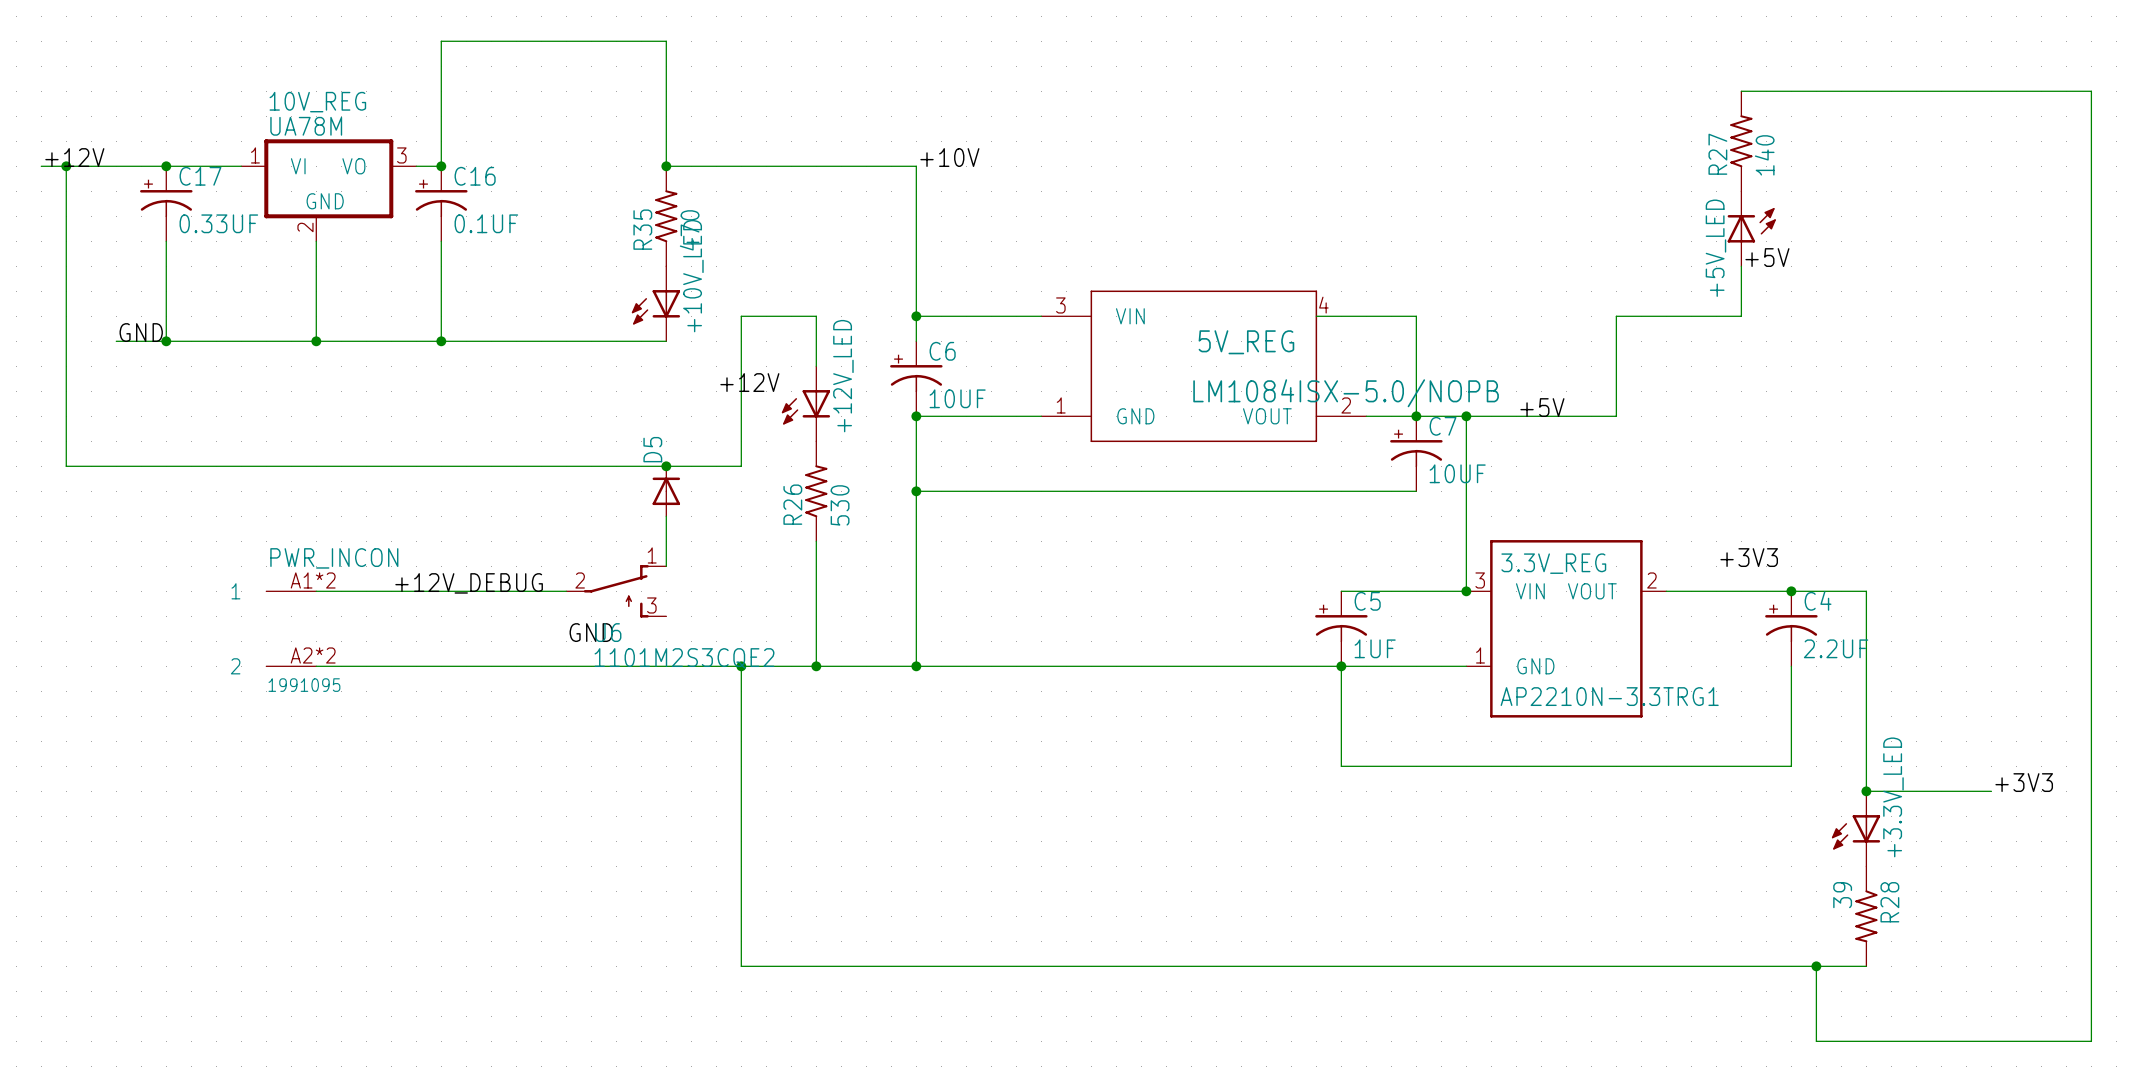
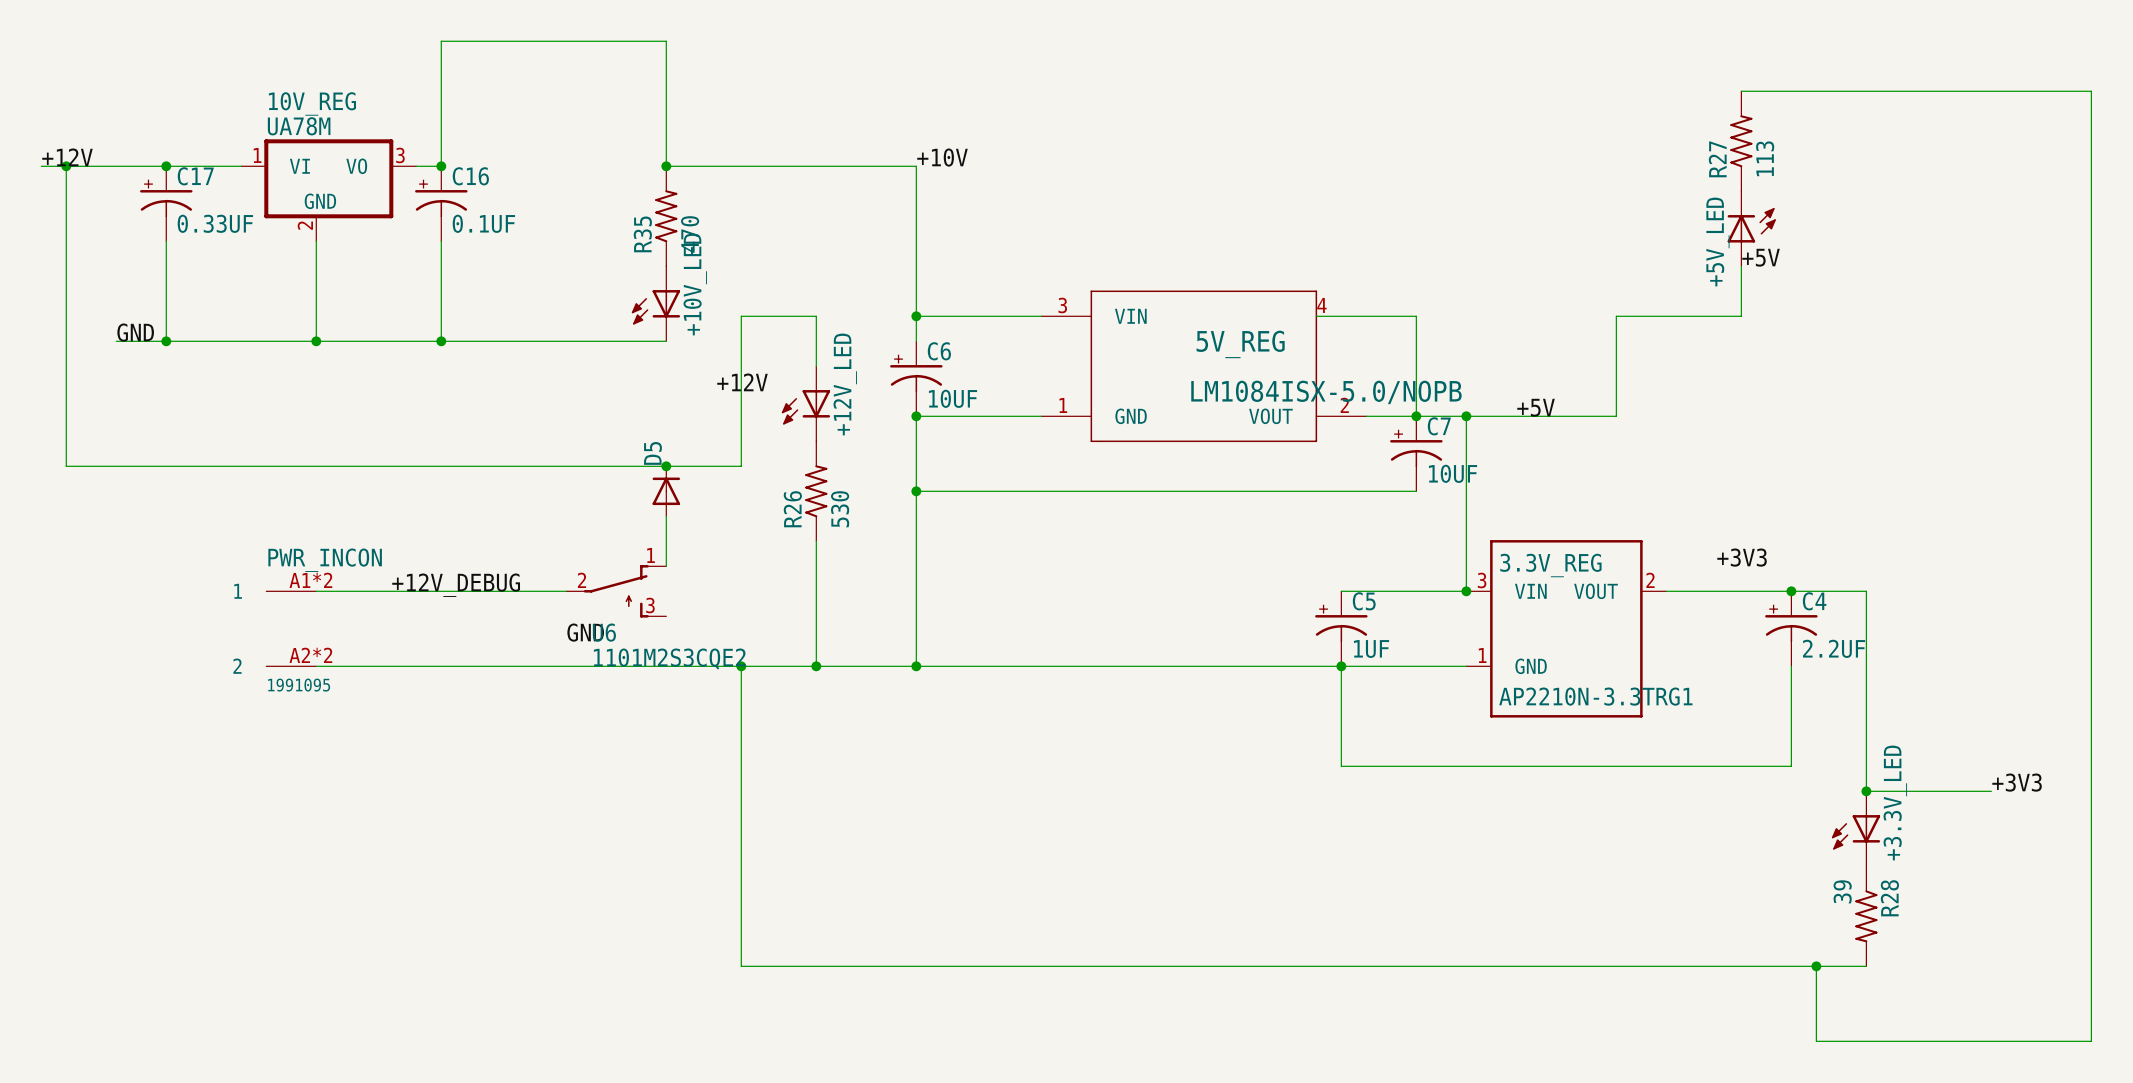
R27 value: 140 (1764, 155) -> 113 (1765, 158)

